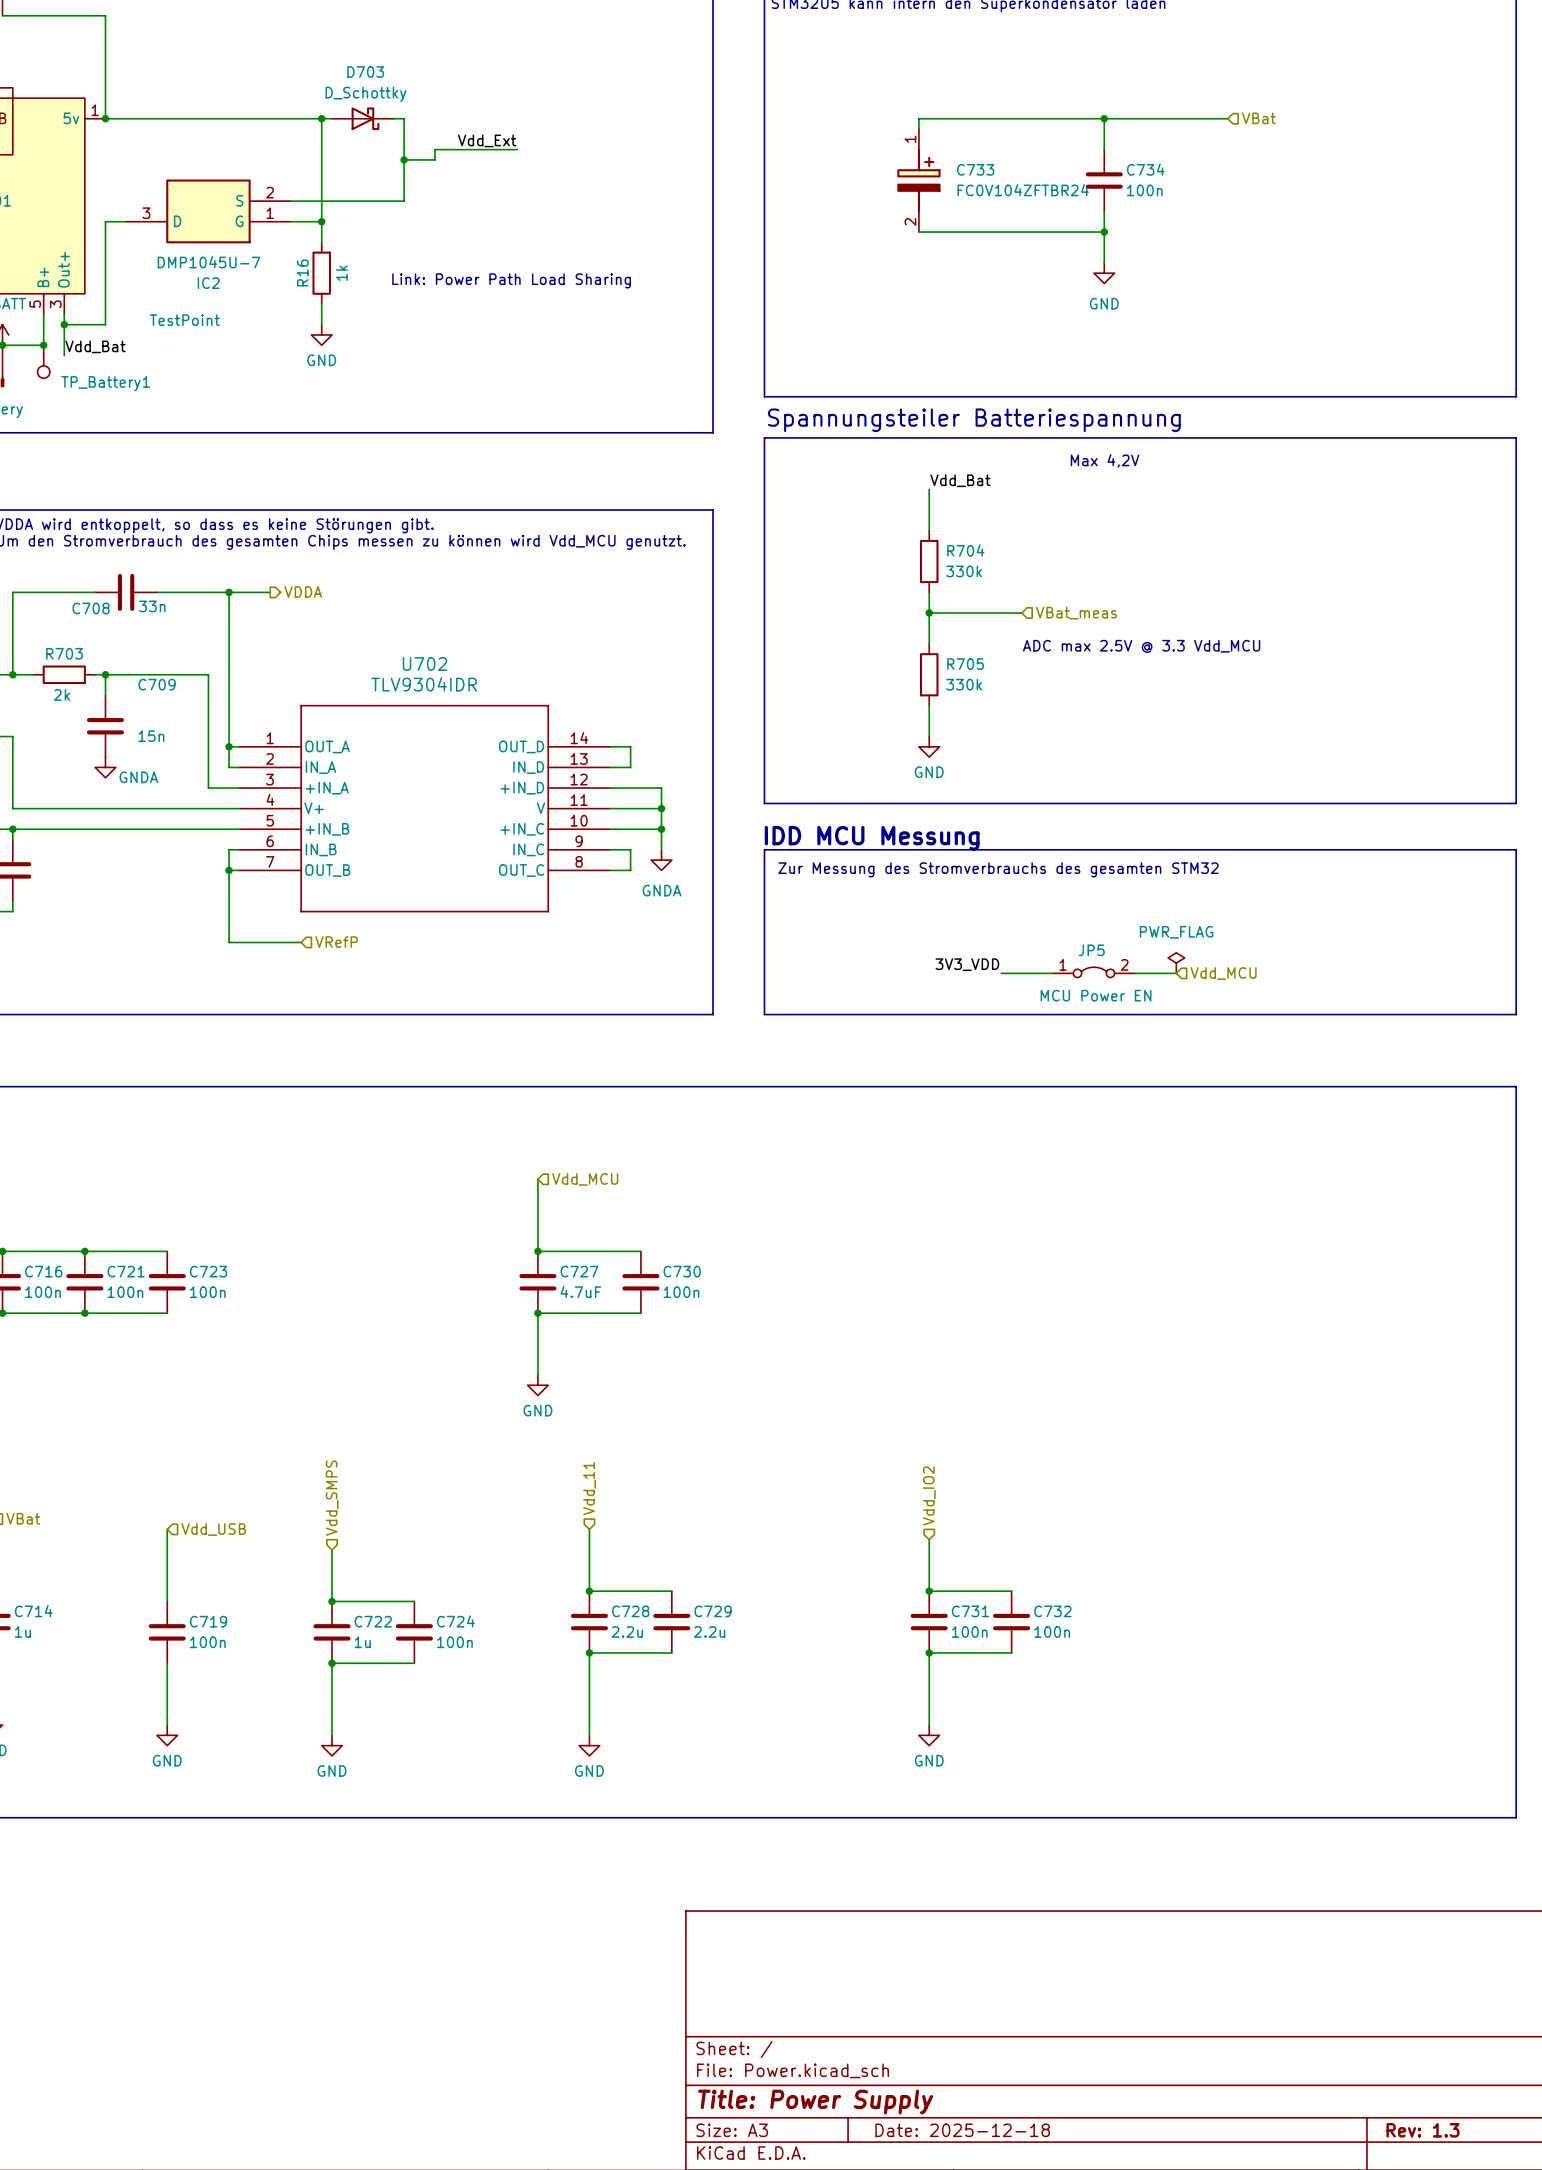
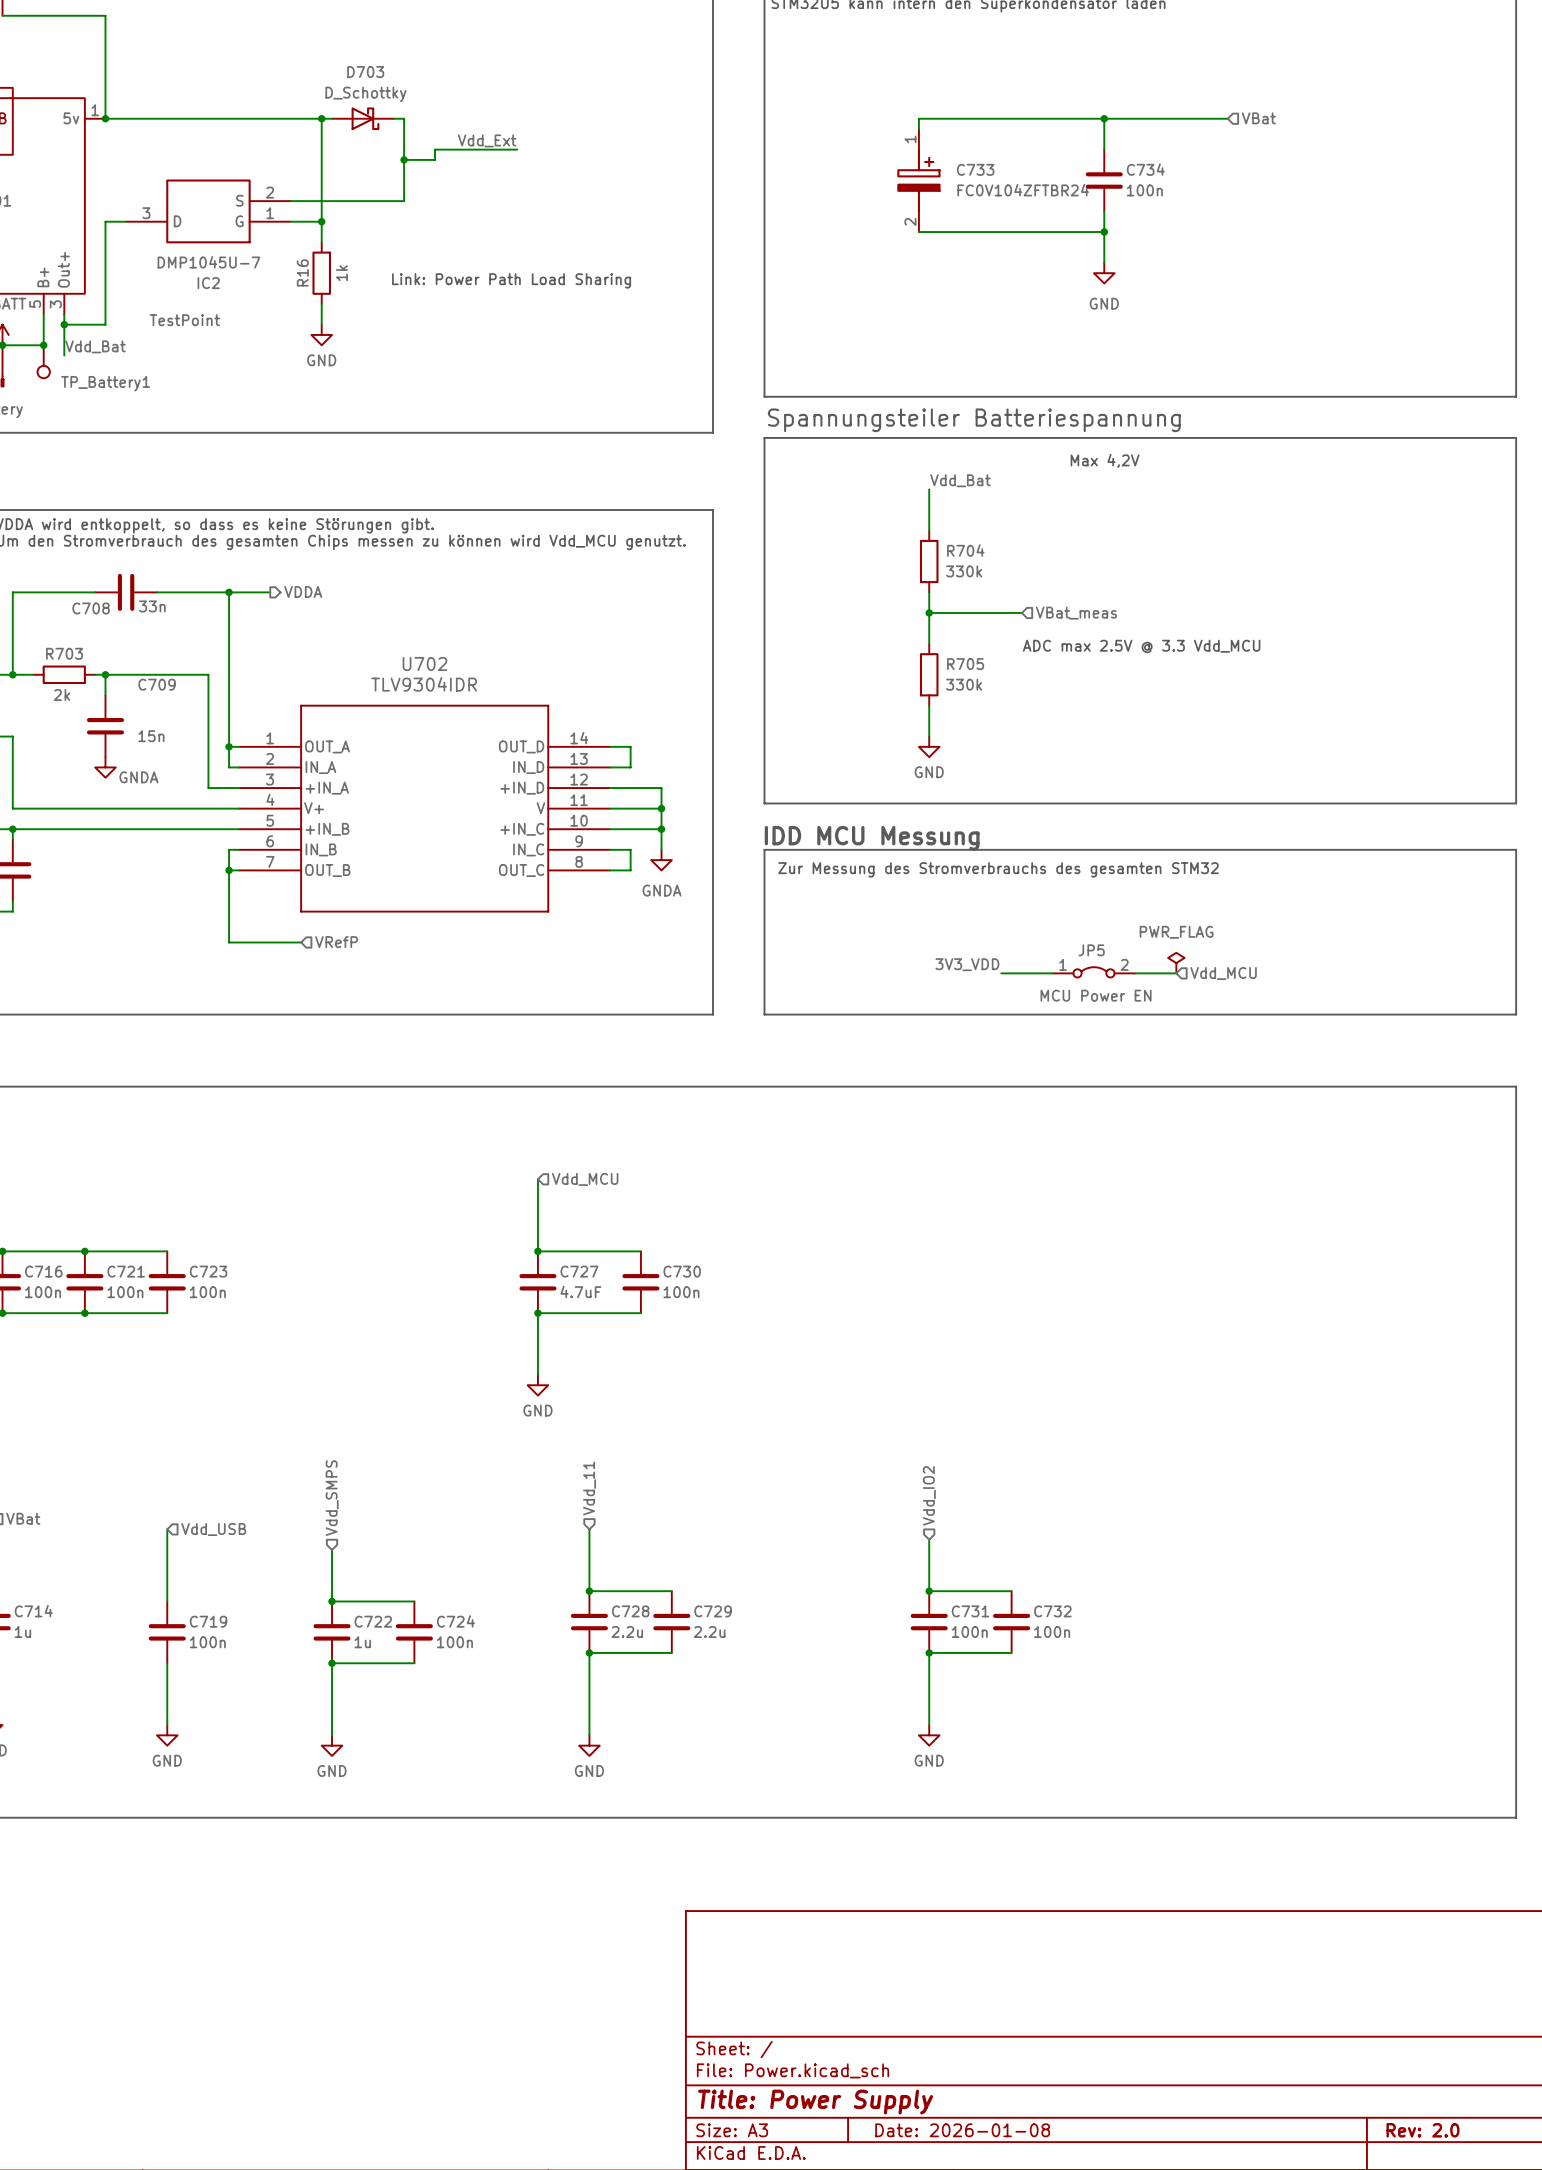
title block: Date: 2025-12-18 (962, 2130) -> Date: 2026-01-08 (962, 2130)
title block: Rev: 1.3 (1423, 2130) -> Rev: 2.0 (1423, 2130)

